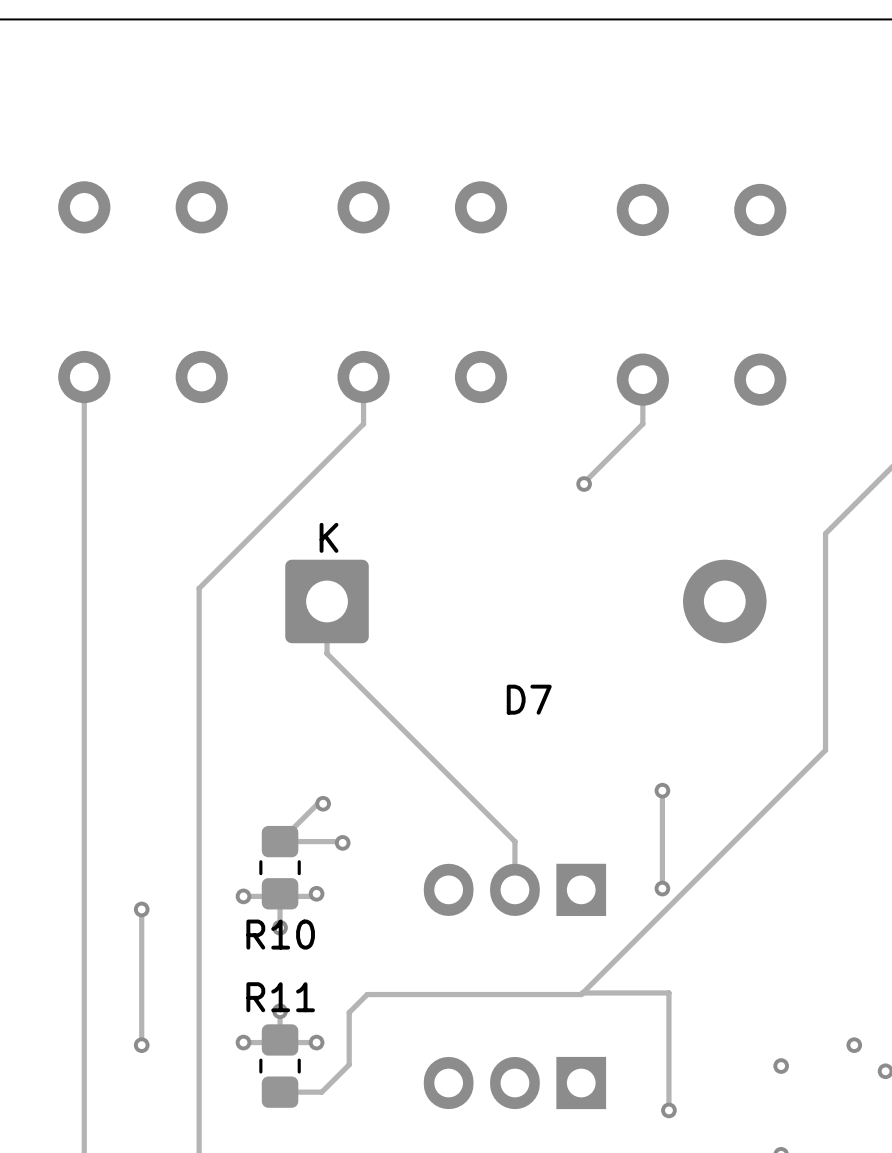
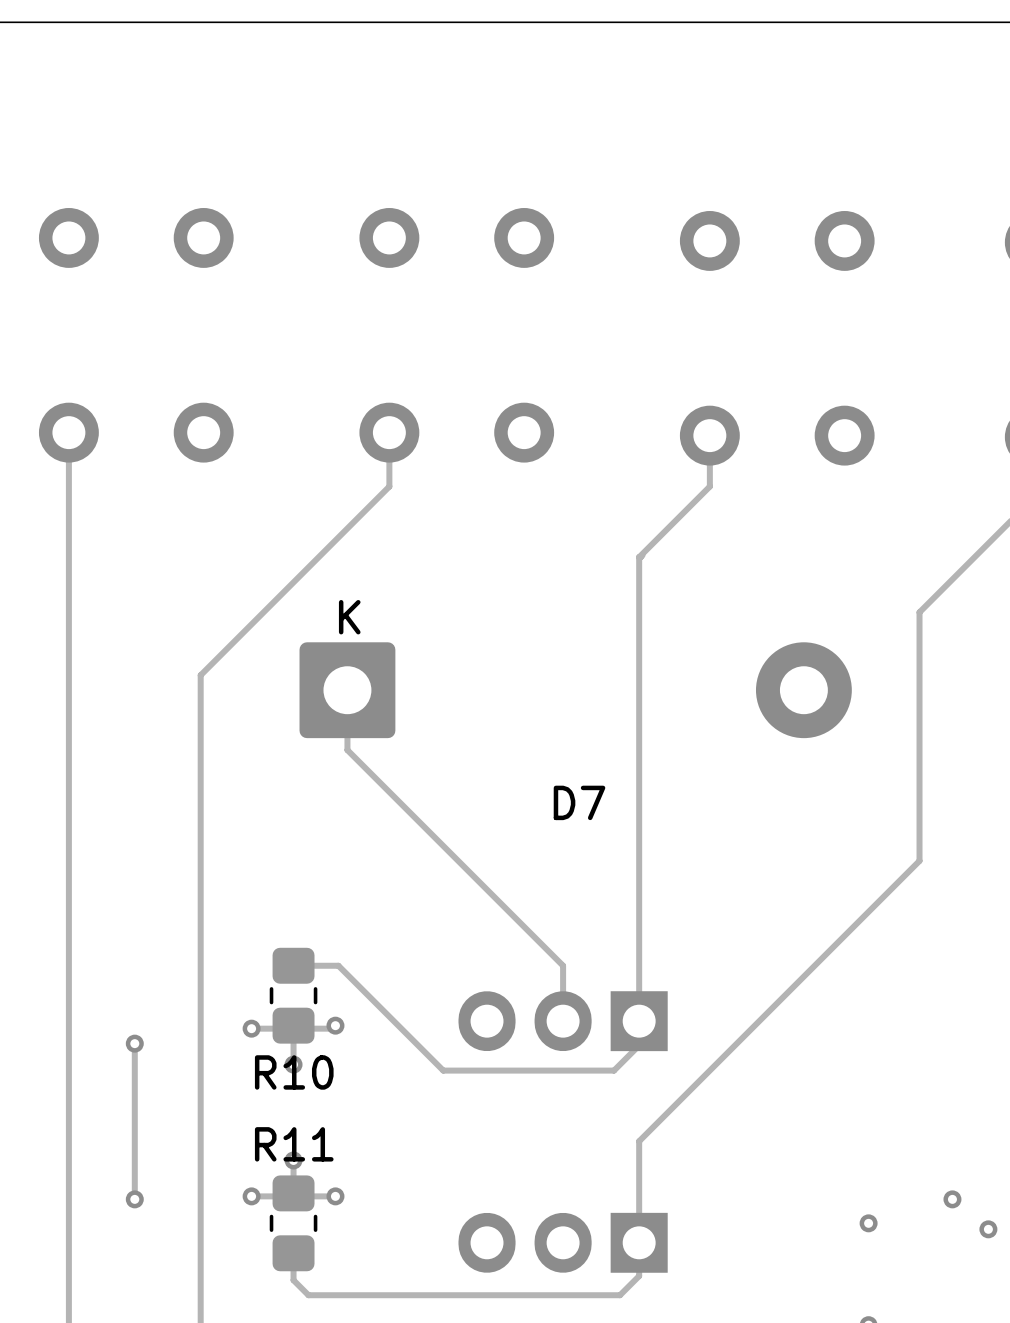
via: (584, 484) -> none
track: (662, 790) (662, 888) -> none
via: (662, 790) -> none
track: (323, 803) (317, 803) (280, 841) -> none
via: (323, 803) -> none
track: (319, 841) (342, 842) -> (338, 965) (443, 1070) (614, 1070) (639, 1045) (639, 557)
via: (342, 842) -> none
via: (662, 888) -> none
track: (582, 992) (668, 992) (668, 1110) -> none
track: (581, 994) (367, 994) (349, 1012) (349, 1064) (321, 1092) (280, 1092) -> (639, 1141) (639, 1276) (620, 1295) (308, 1295) (293, 1280) (293, 1253)
via: (668, 1110) -> none

